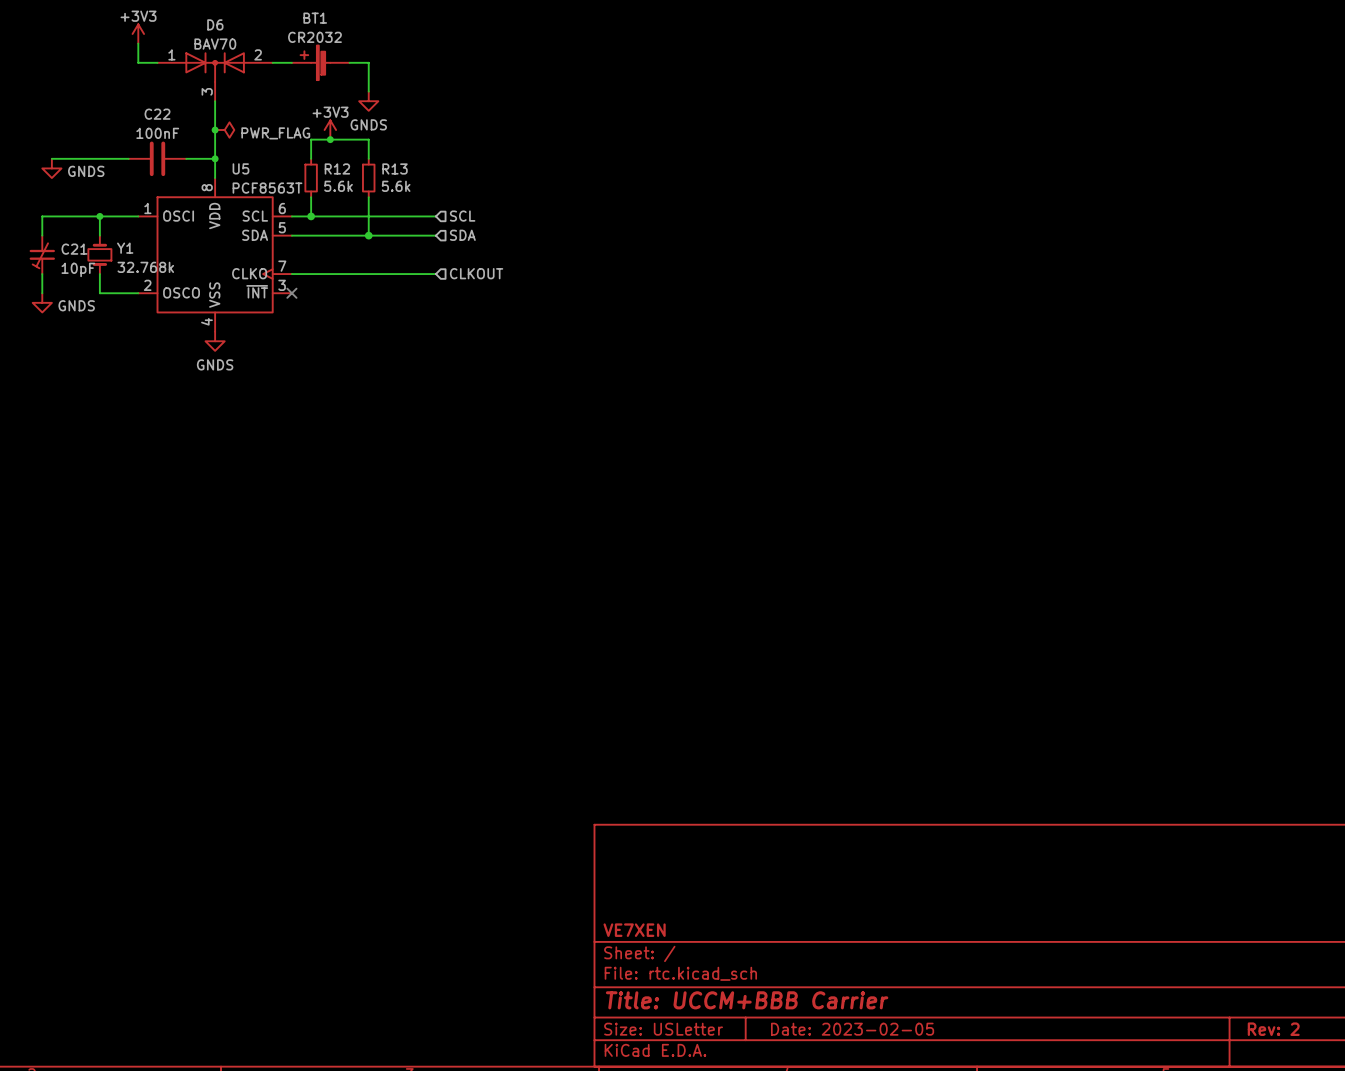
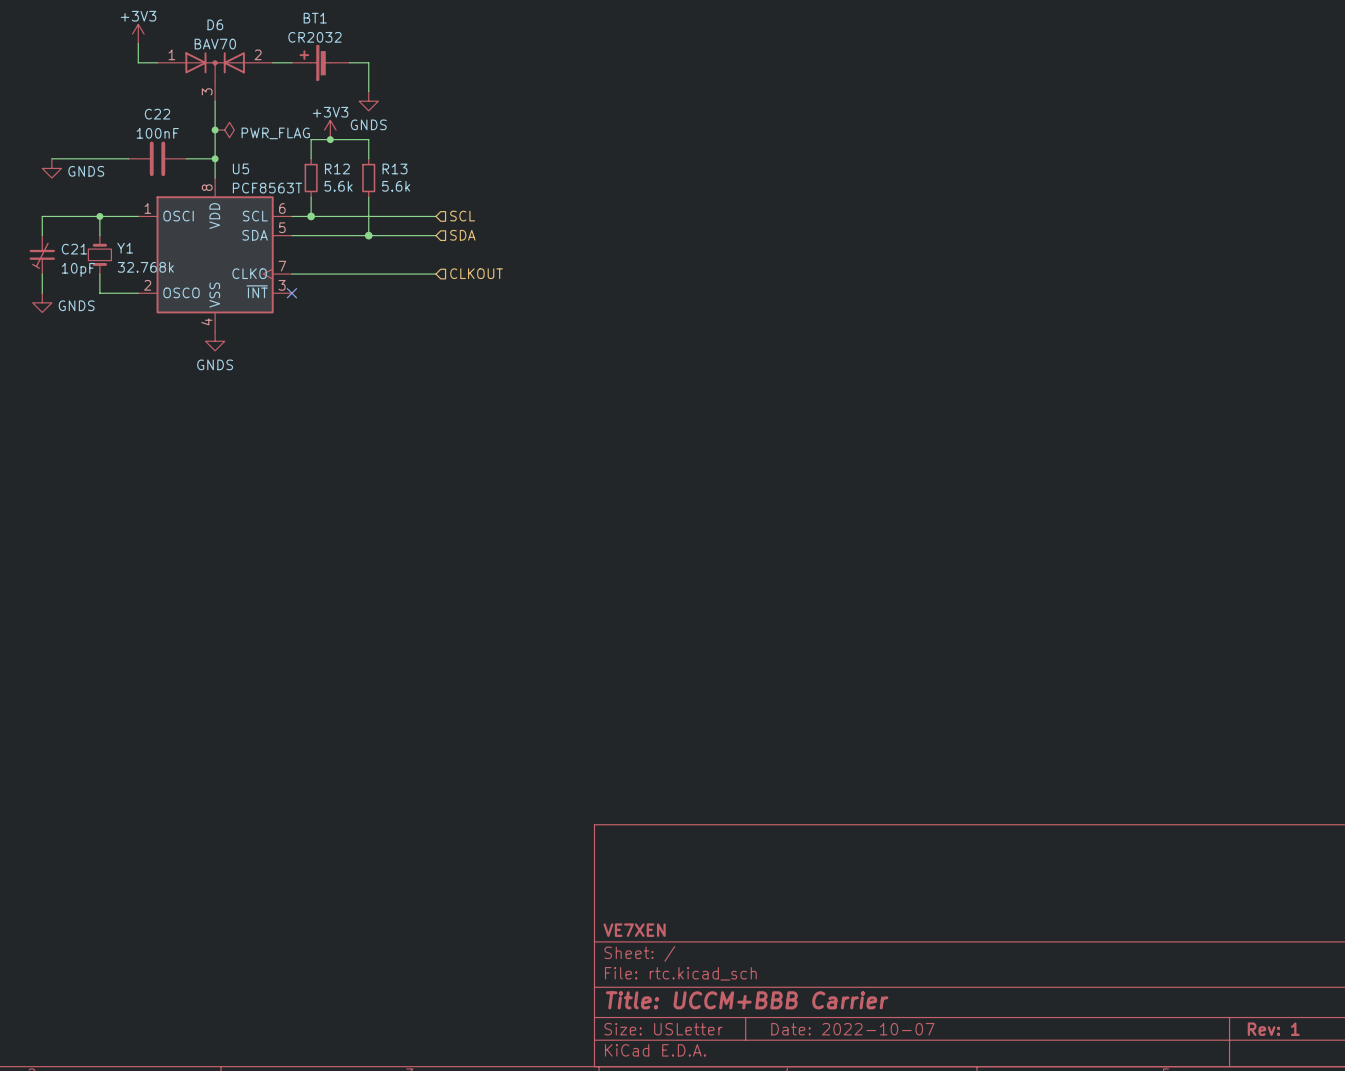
title block: Date: 2023-02-05 (852, 1029) -> Date: 2022-10-07 (852, 1029)
title block: Rev: 2 (1273, 1029) -> Rev: 1 (1273, 1029)

